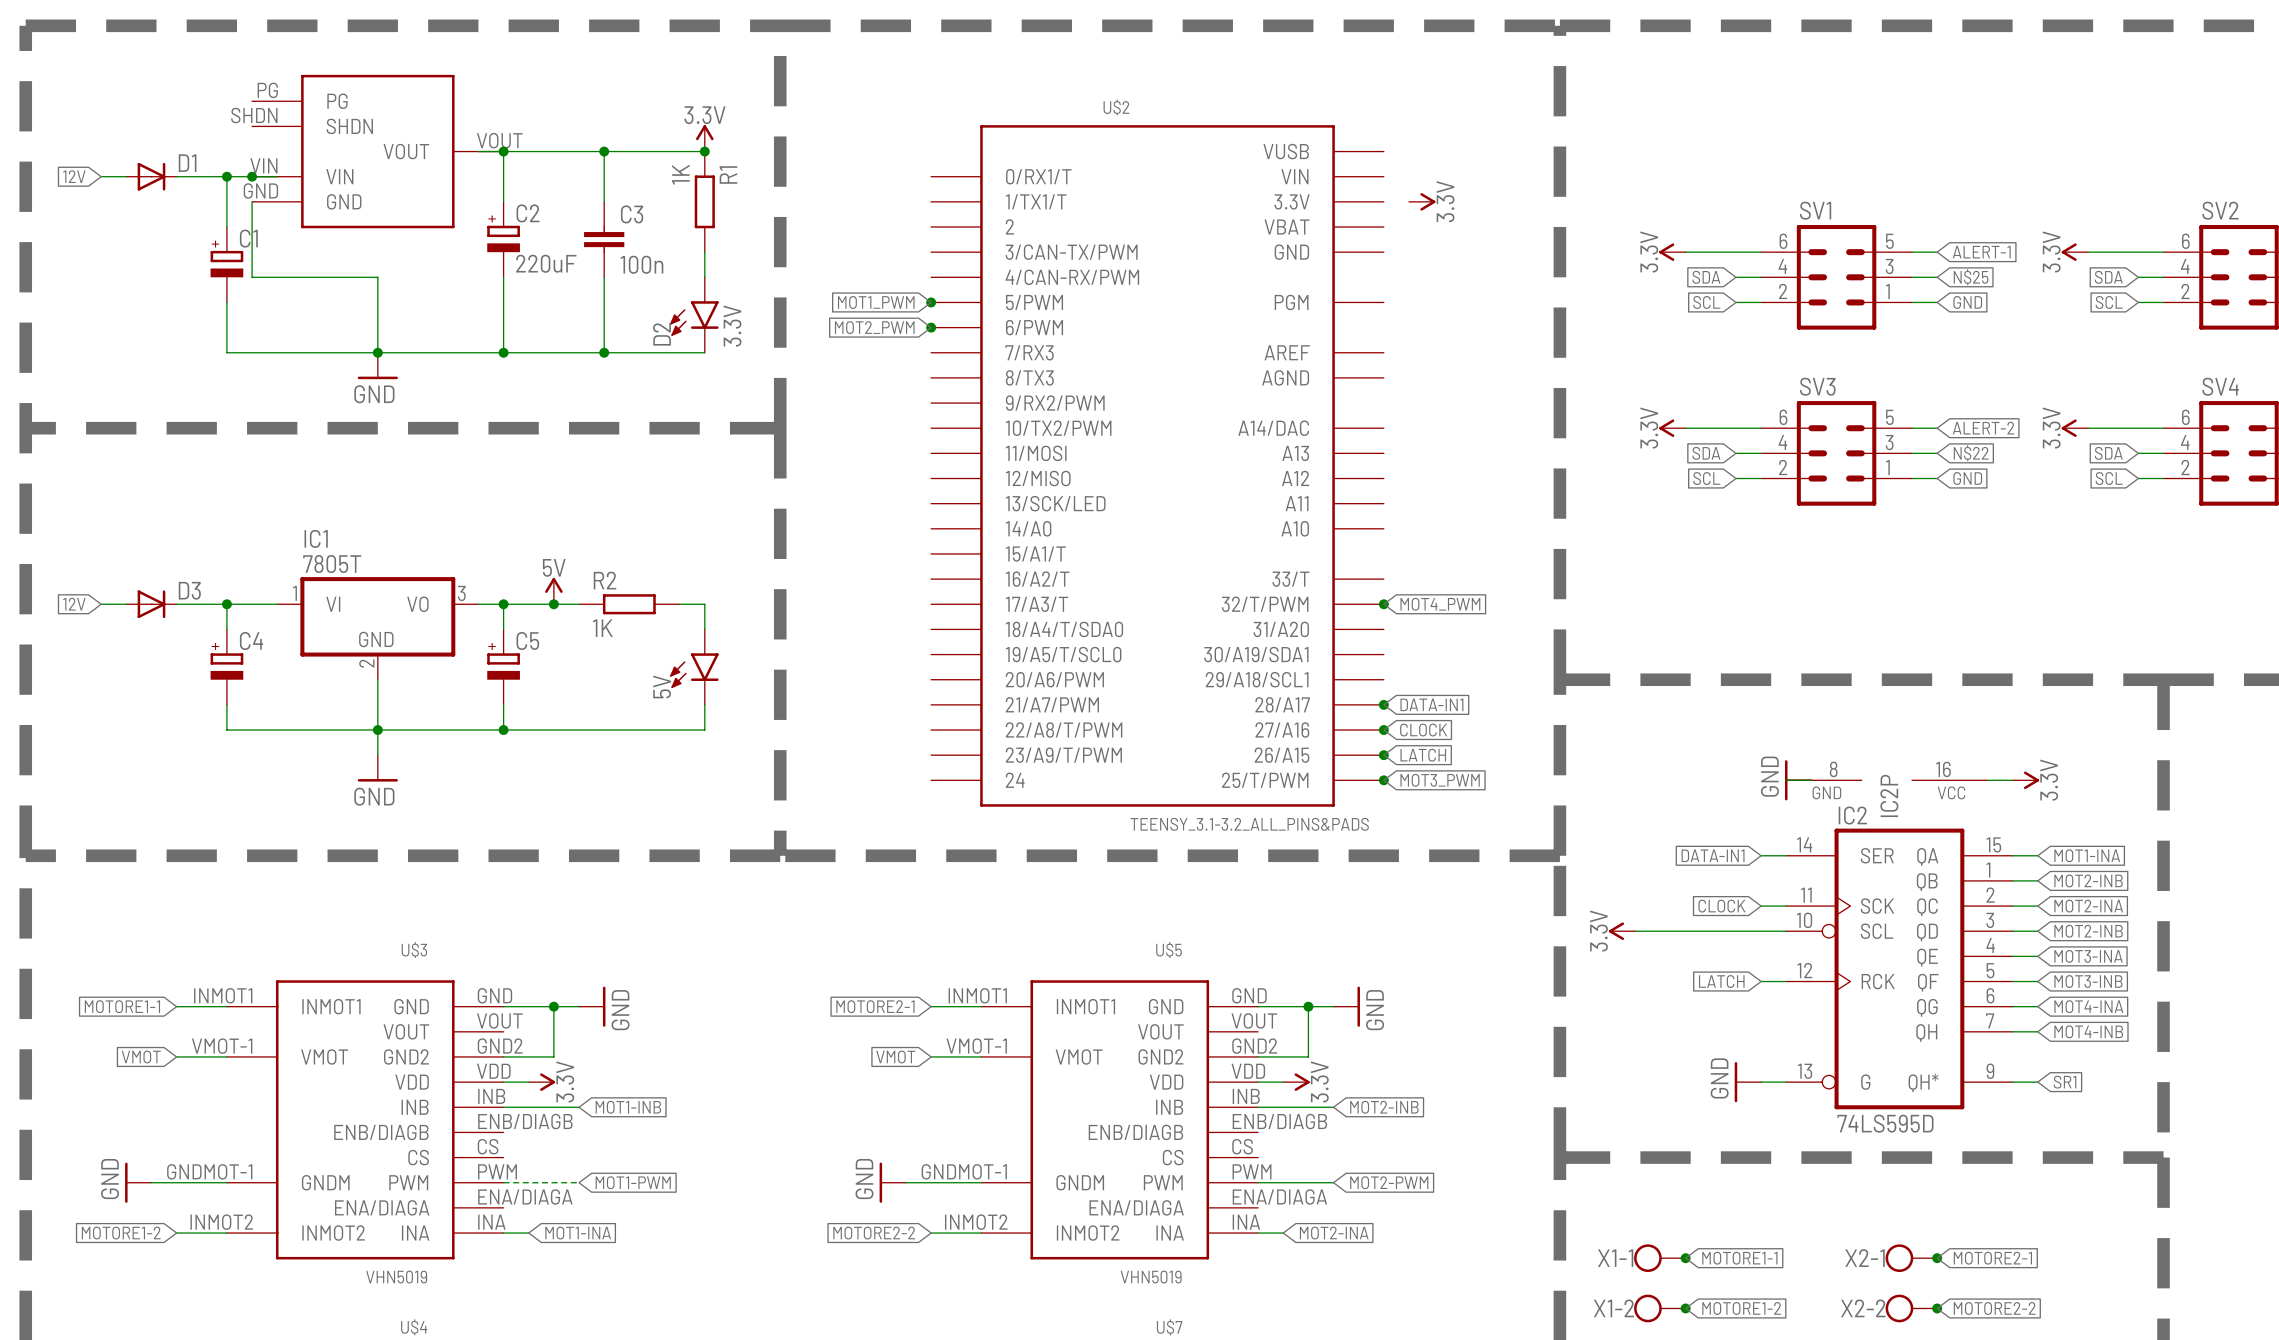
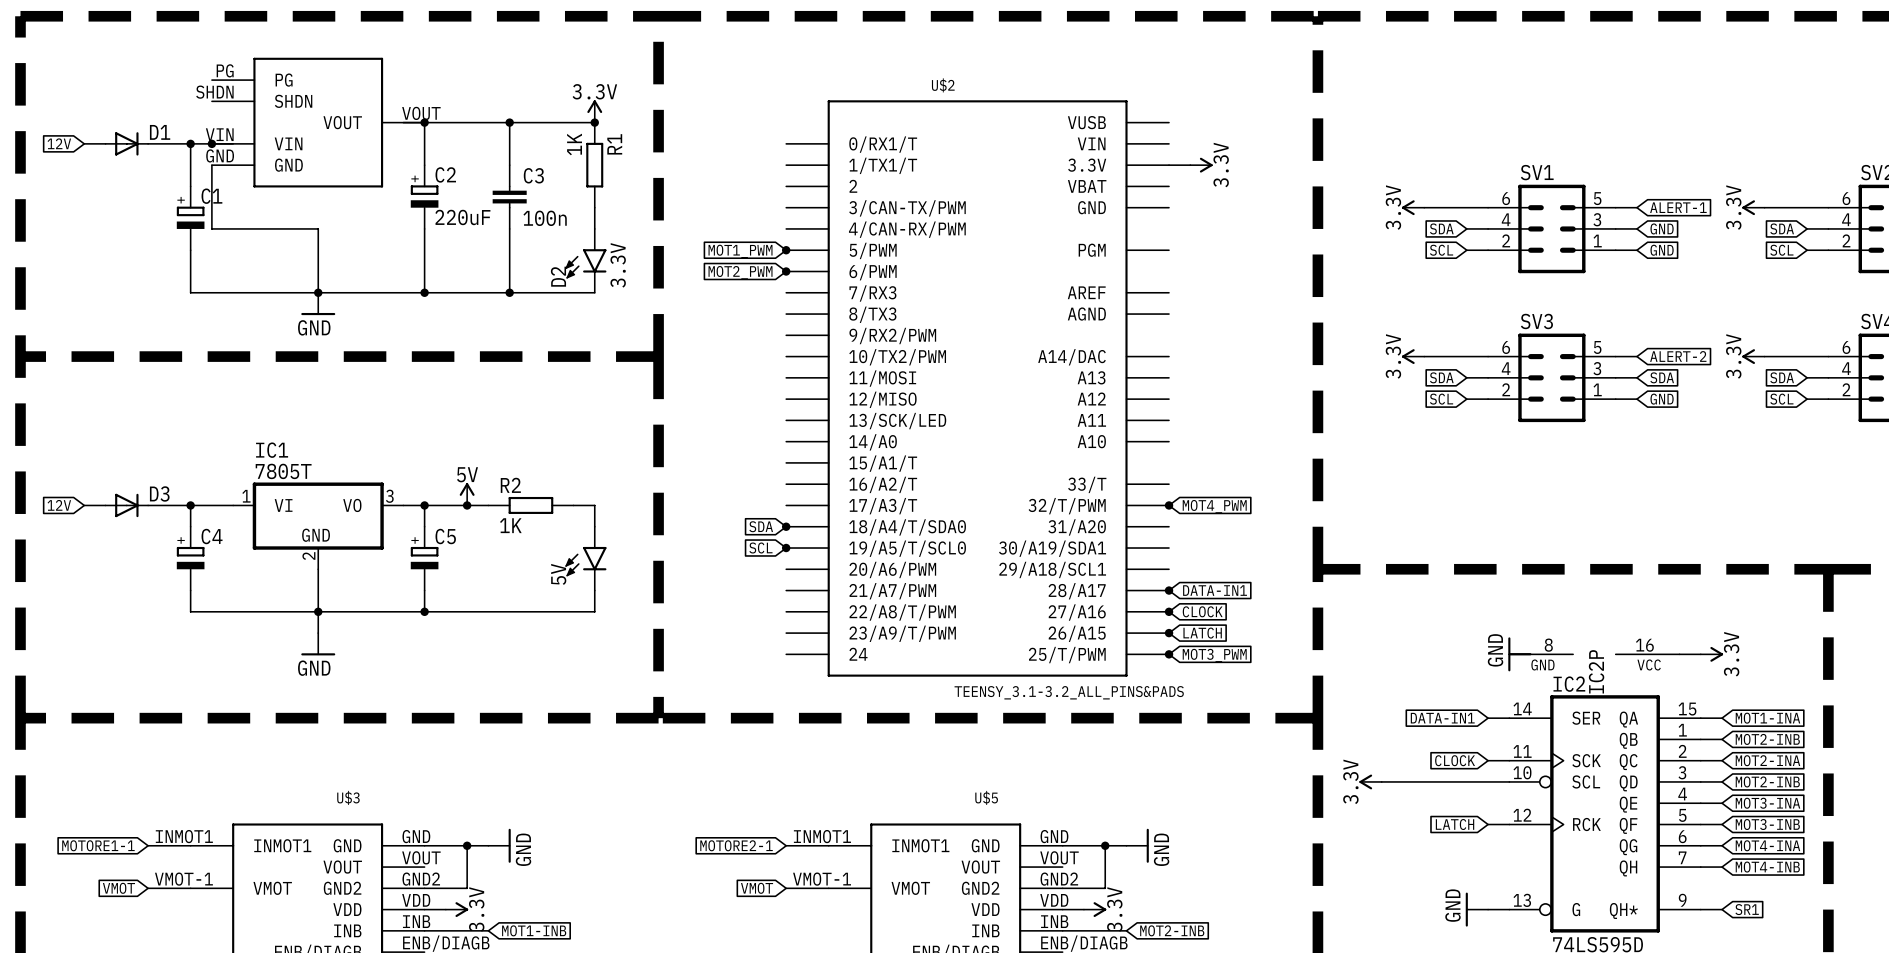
wire: none -> (1169, 165) (1190, 165)
global label: N$25 (1971, 277) -> GND (1662, 228)
global label: N$22 (1971, 453) -> SDA (1662, 377)
global label: none -> SDA (761, 526)
junction: none -> (786, 526)
global label: none -> SCL (760, 548)
junction: none -> (786, 548)

